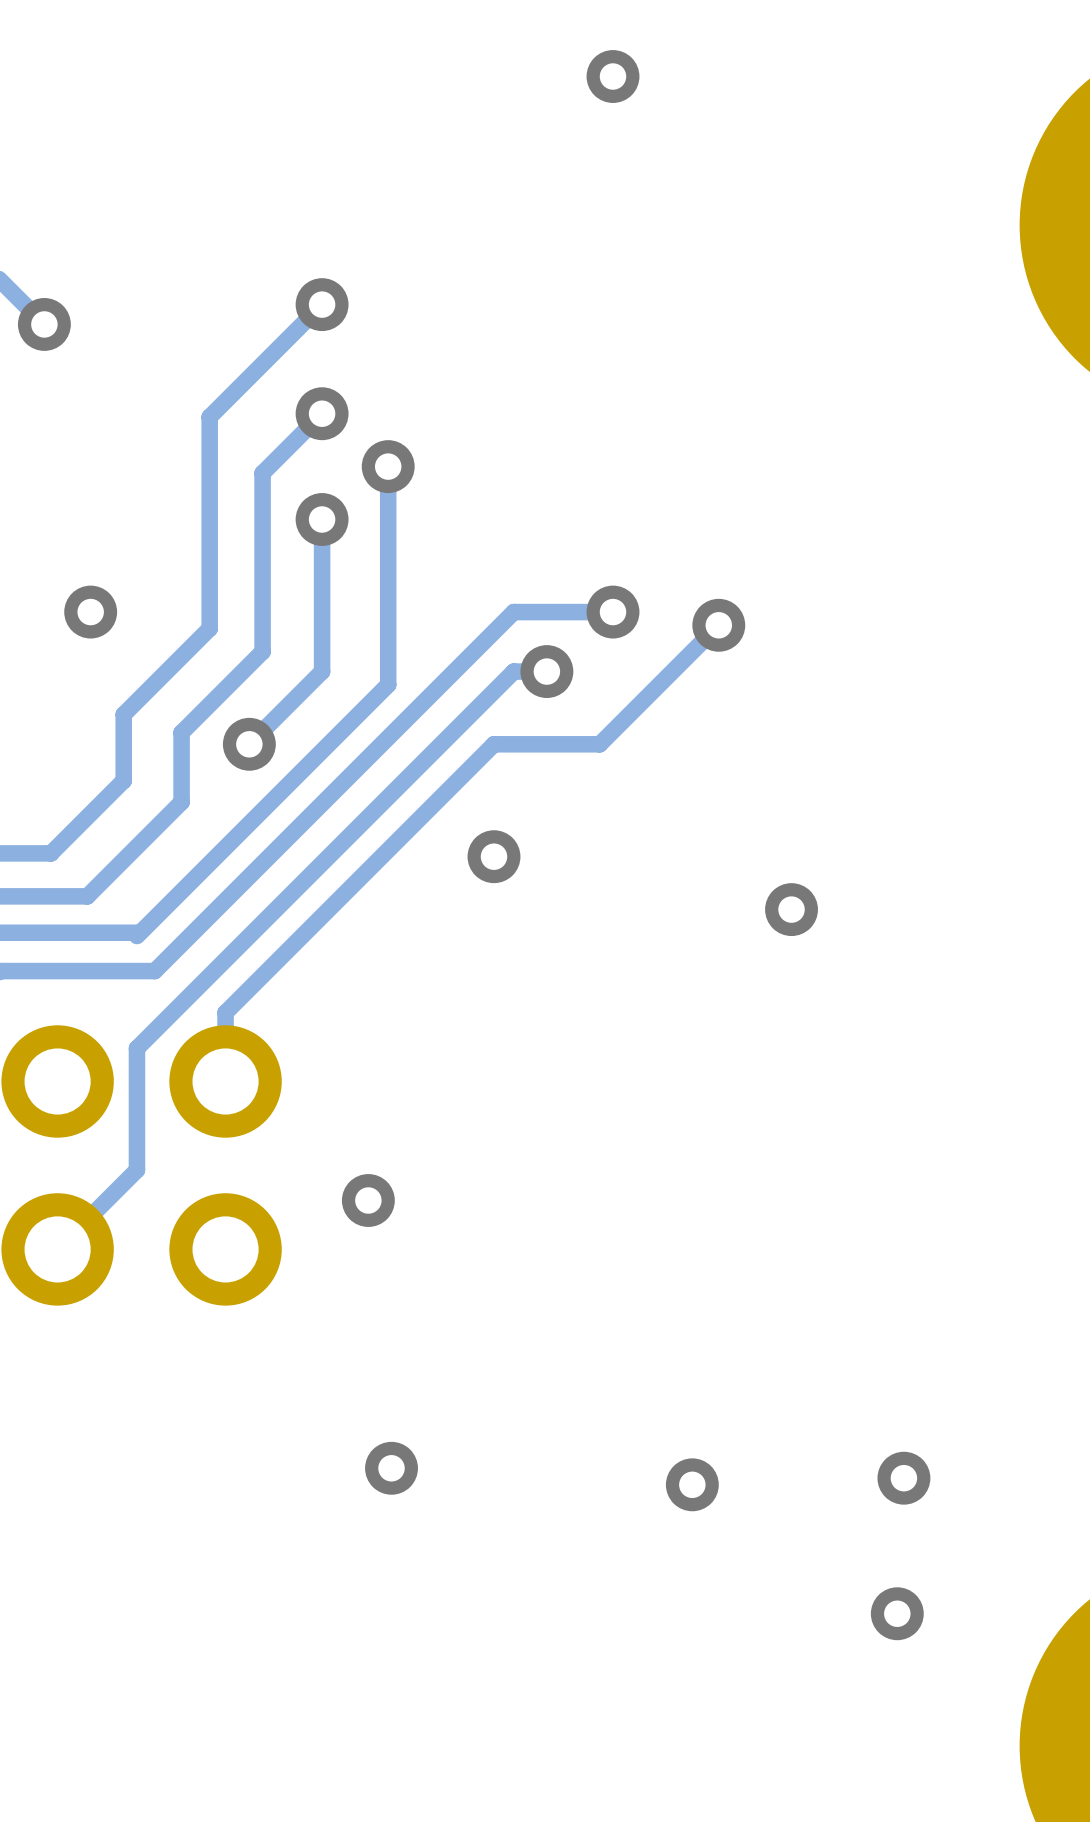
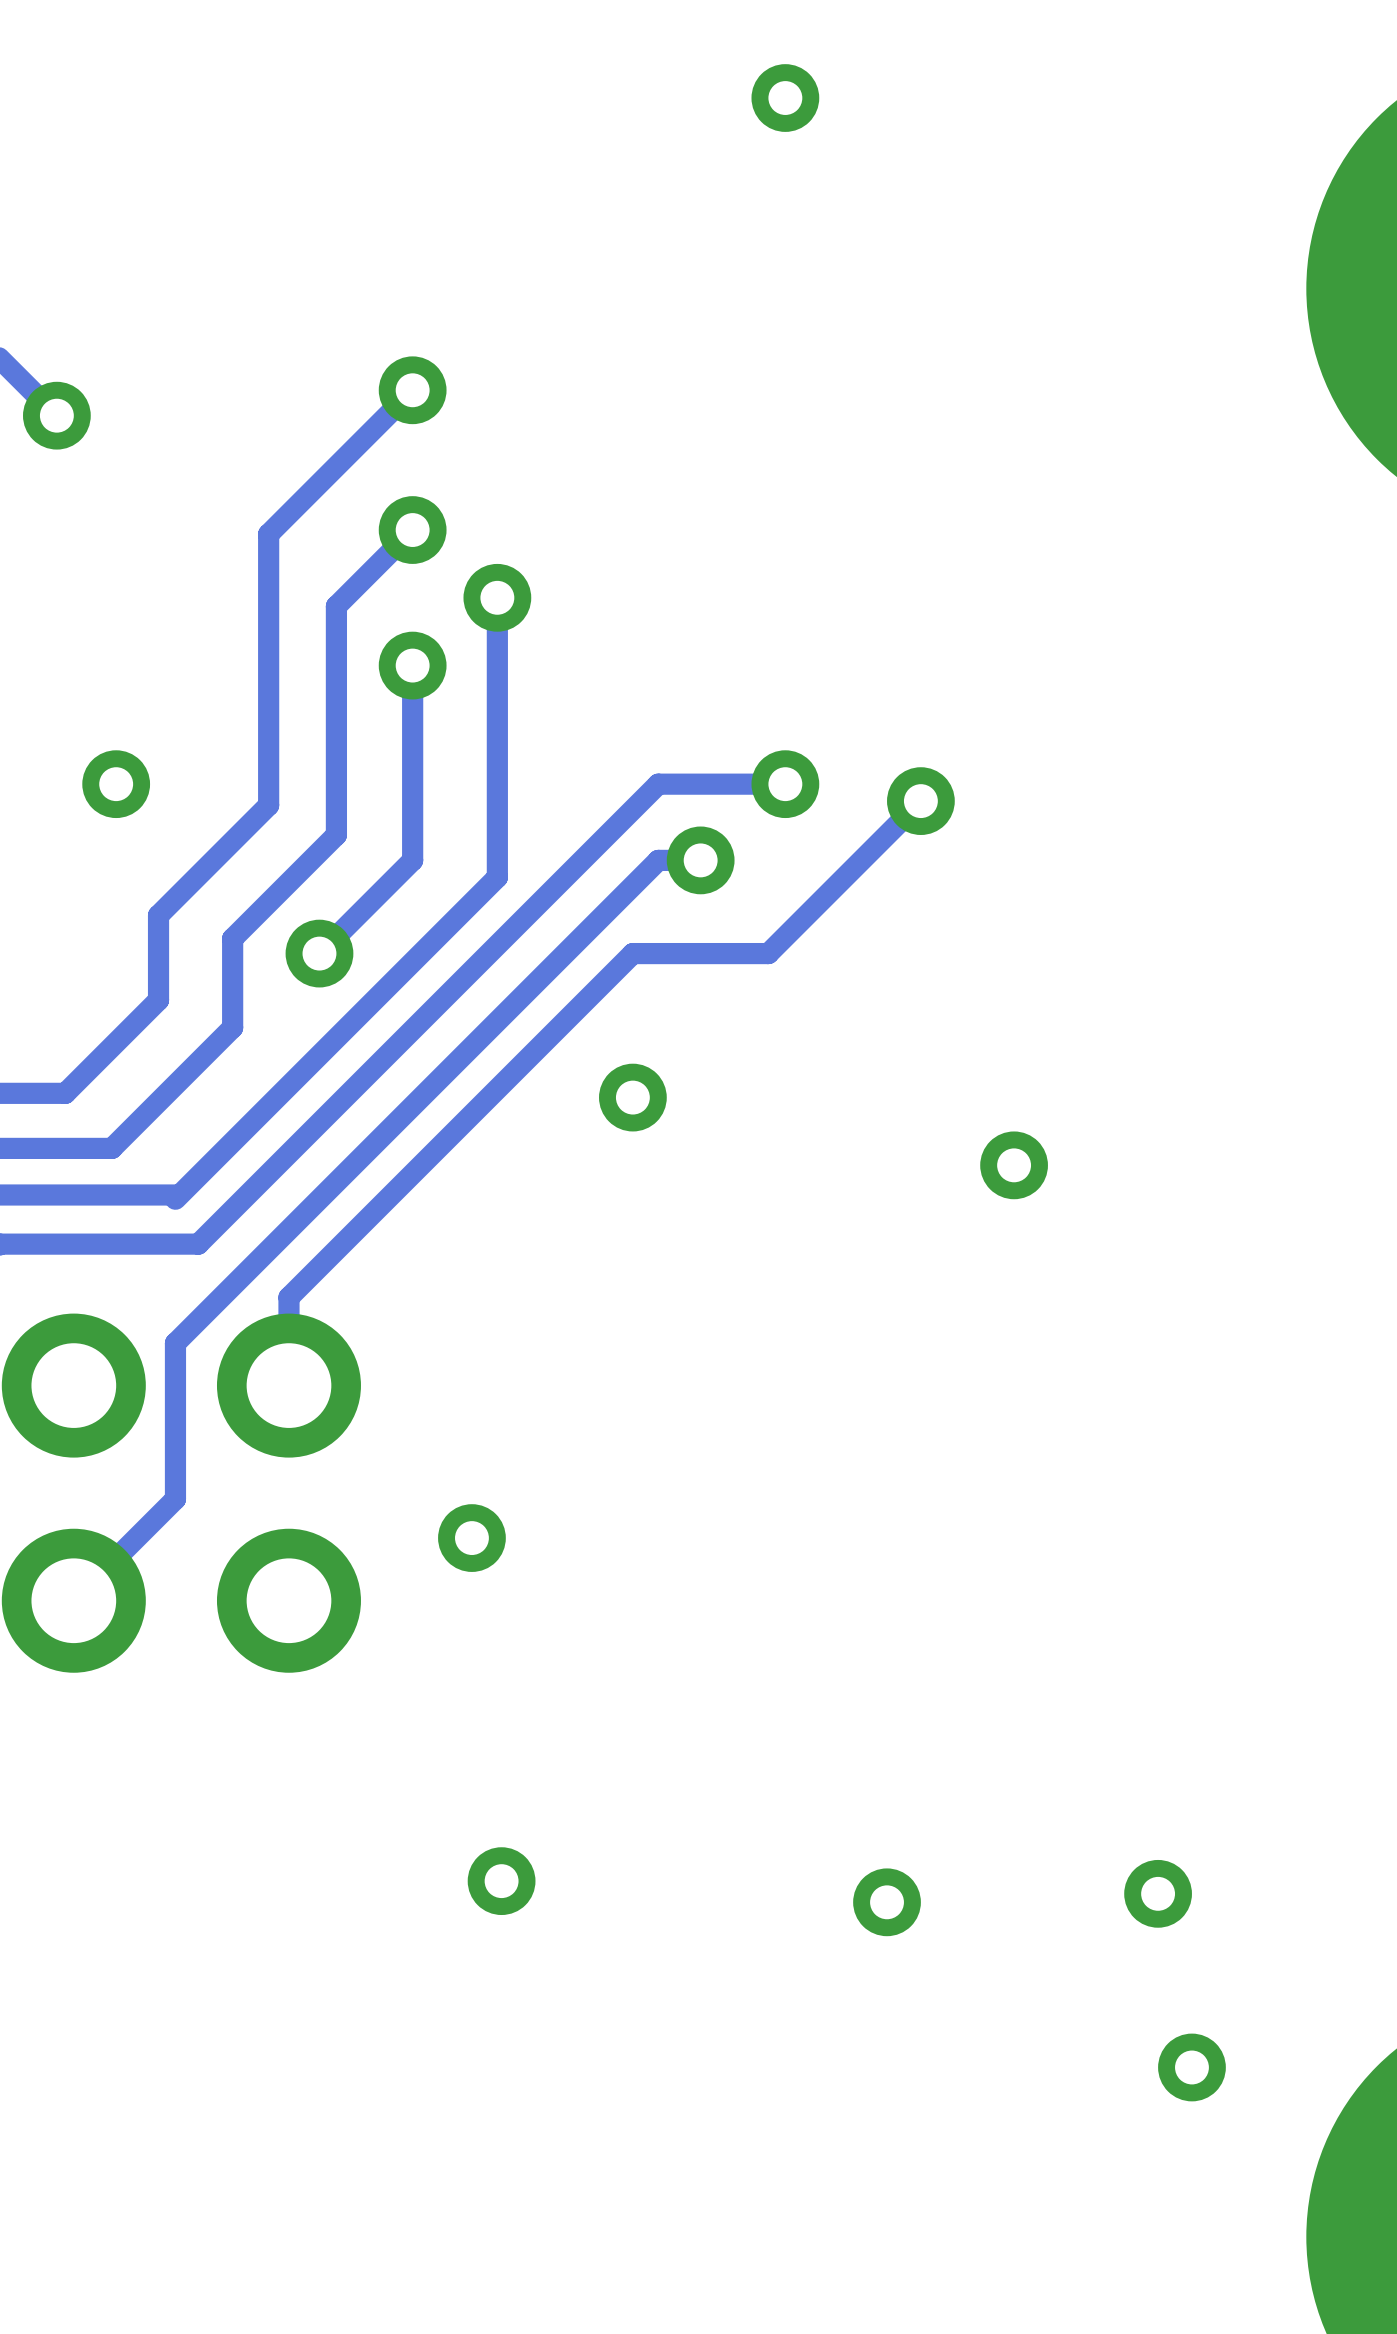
via position: (897, 1613) -> (1191, 2067)

